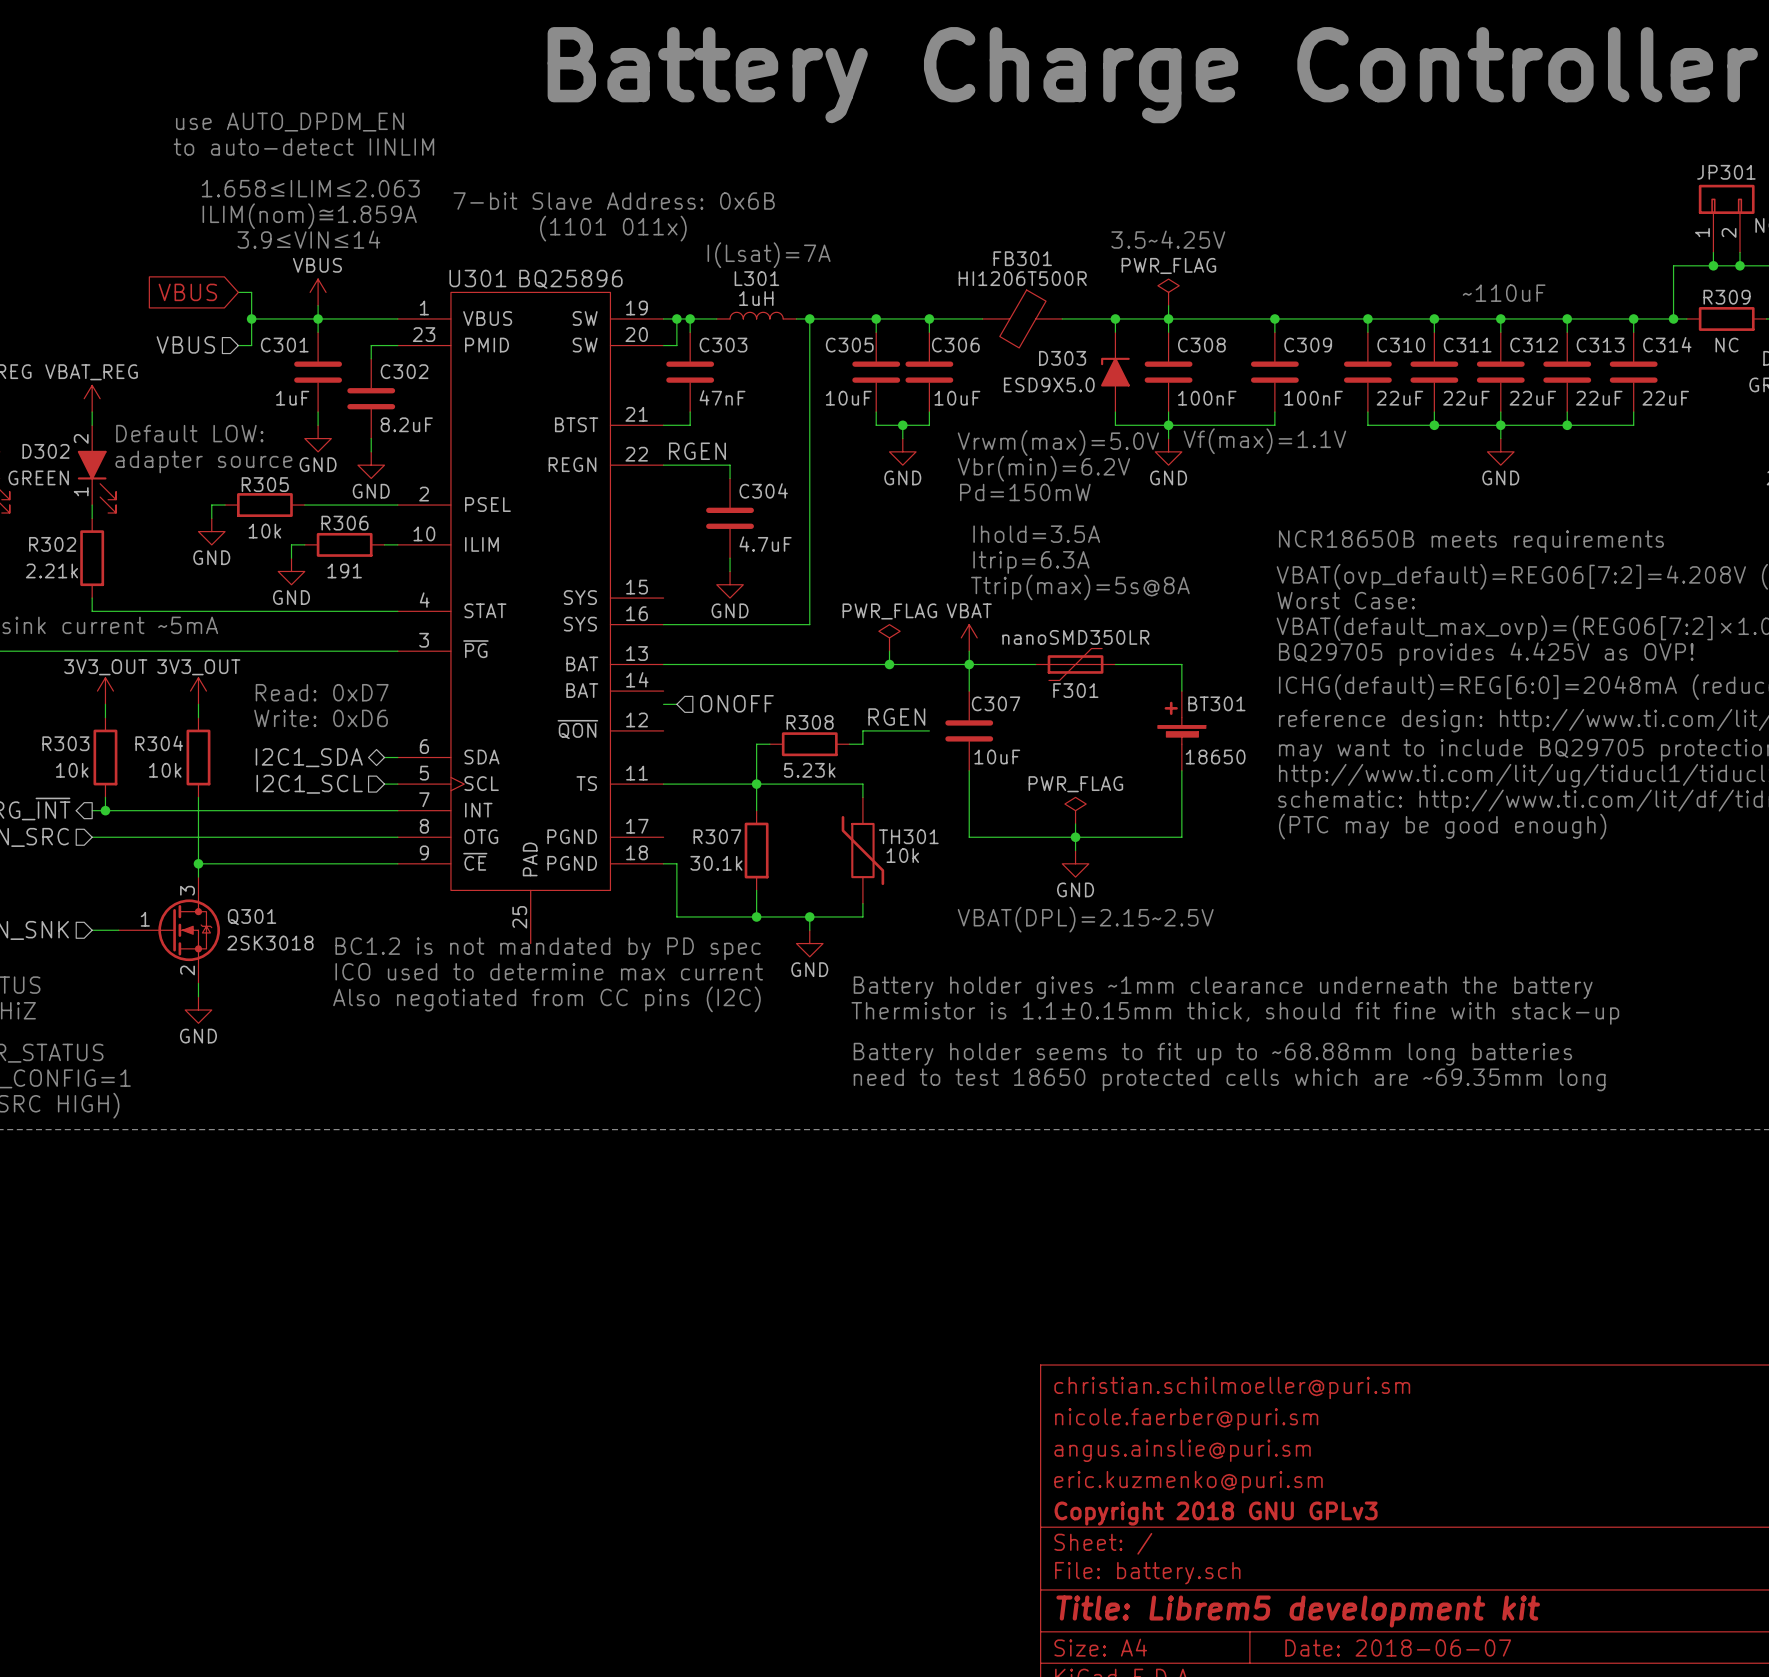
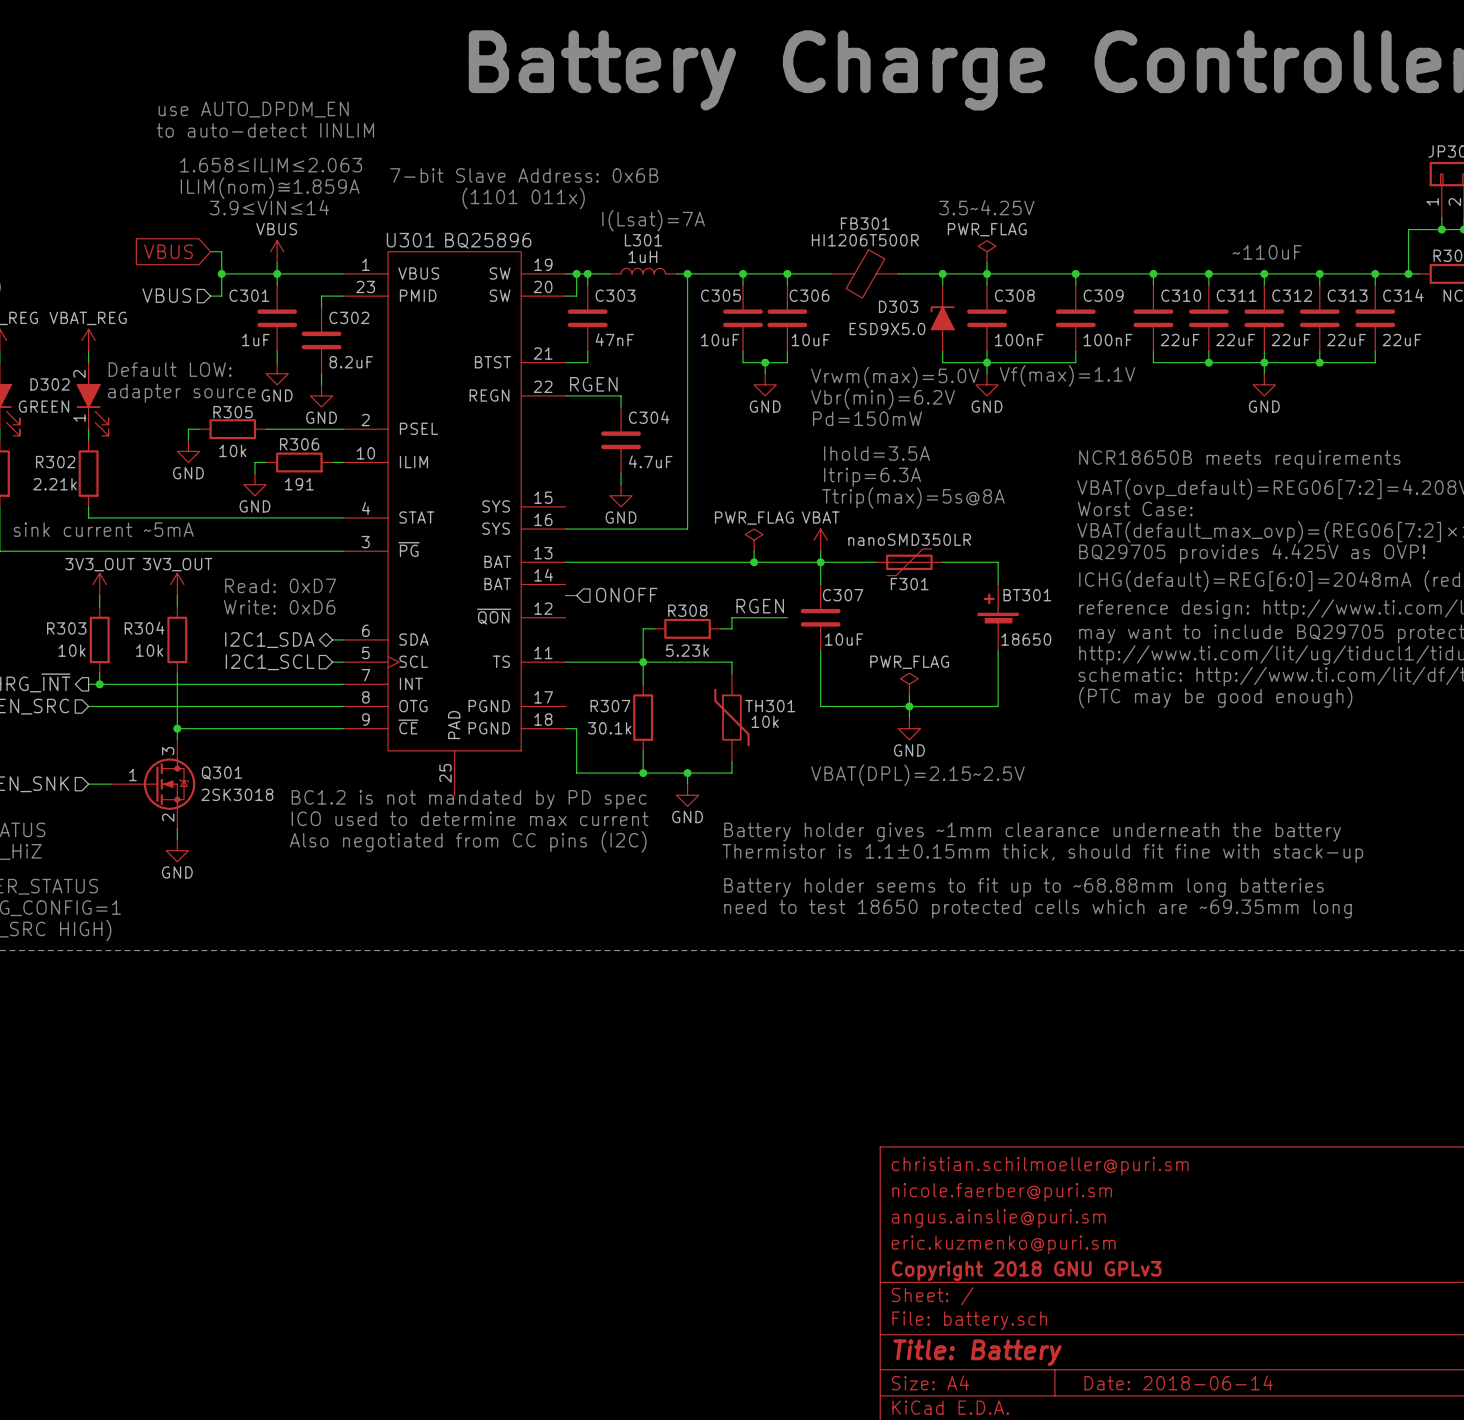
title block: Title: Librem5 development kit (1298, 1611) -> Title: Battery (977, 1352)
title block: Date: 2018-06-07 (1398, 1647) -> Date: 2018-06-14 (1178, 1382)

